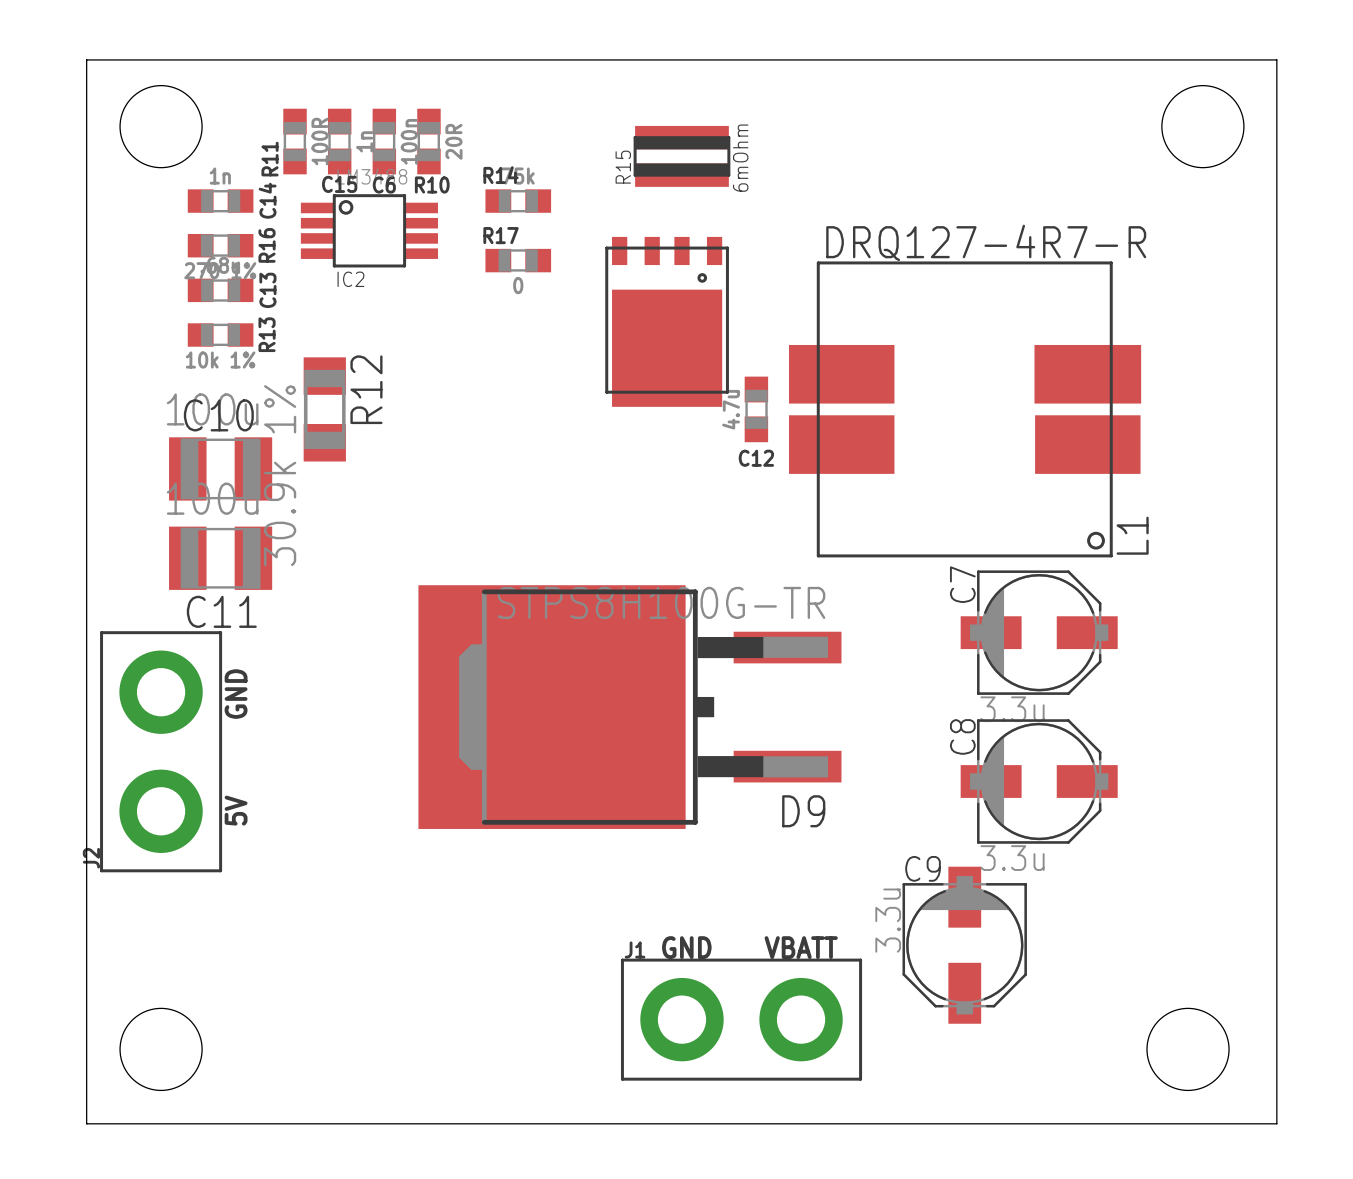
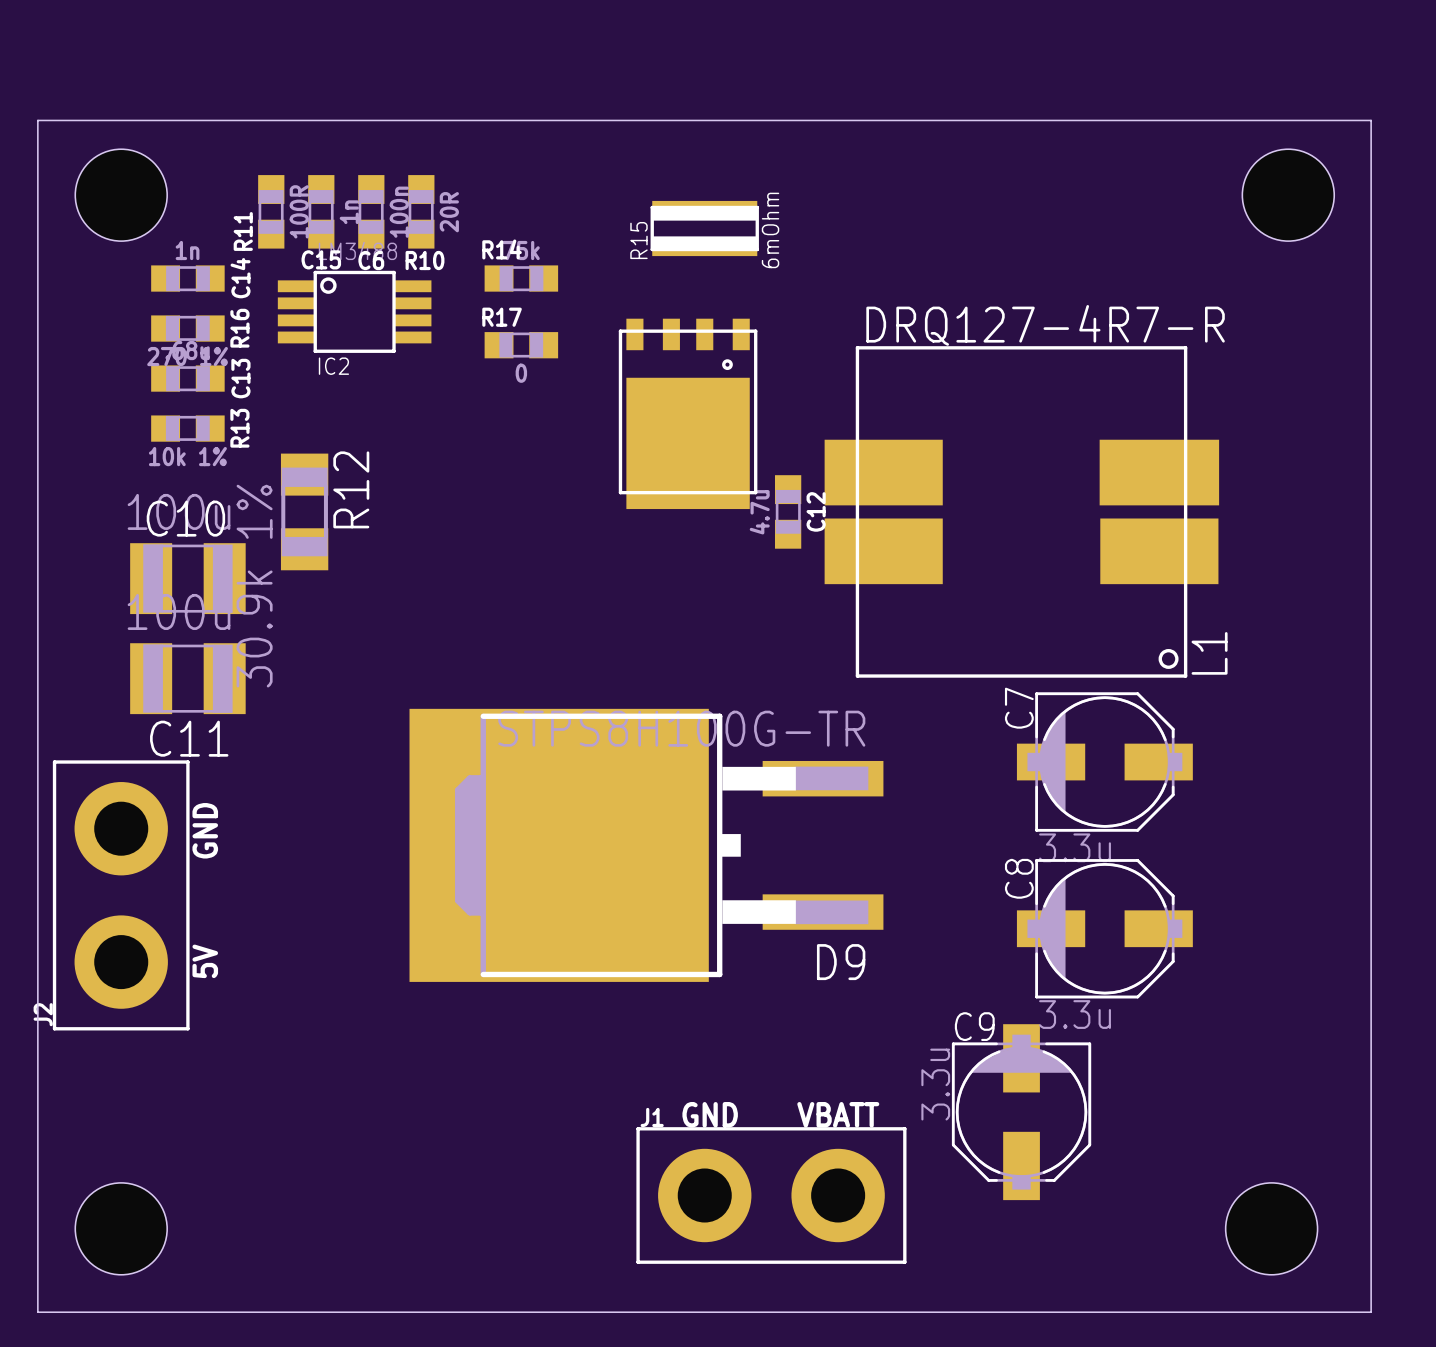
R15 footprint: [633, 125, 731, 187] -> [650, 200, 759, 257]
C12 name rotation: 0° (756, 458) -> 90° counterclockwise (816, 511)
C12 name position: C12 (756, 458) -> C12 (816, 511)

